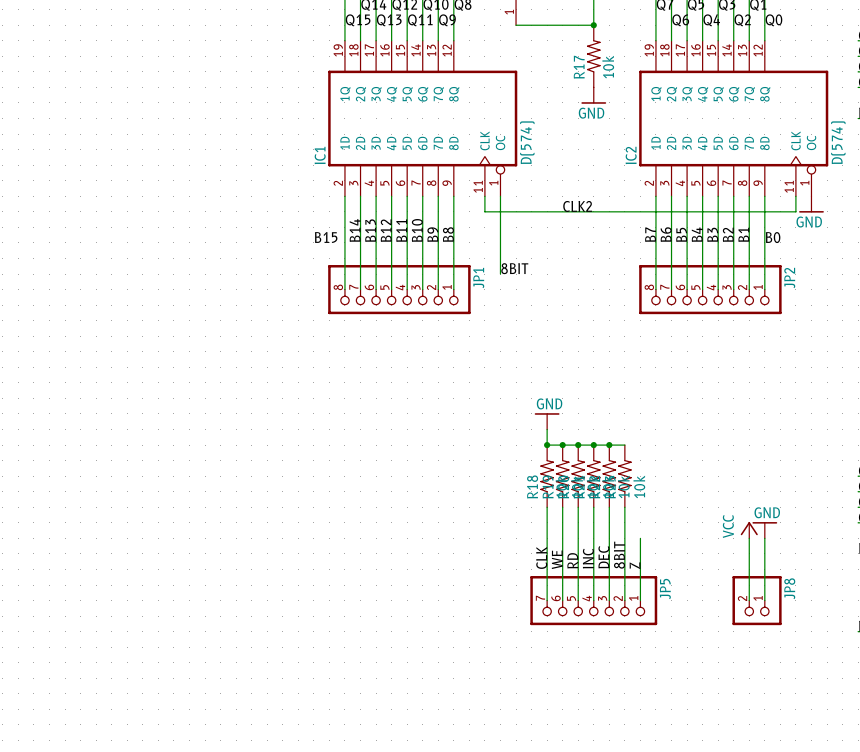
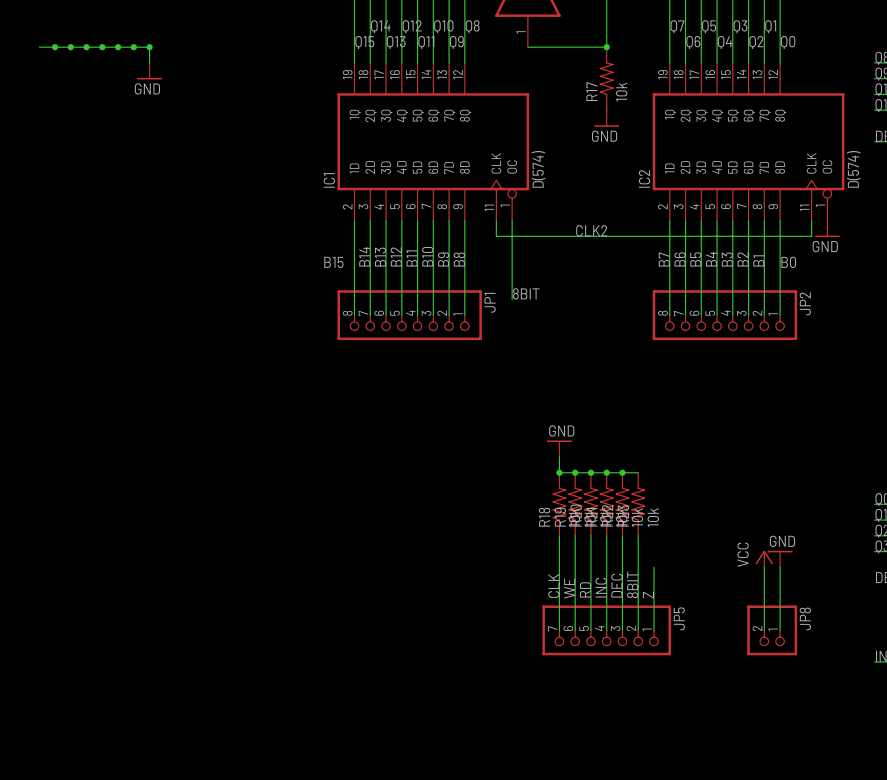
wire: none -> (39, 47) (149, 47) (149, 62)
junction: none -> (55, 47)
junction: none -> (70, 47)
junction: none -> (86, 47)
junction: none -> (102, 47)
junction: none -> (118, 47)
junction: none -> (133, 47)
junction: none -> (149, 47)
power symbol: none -> GND (149, 71)

